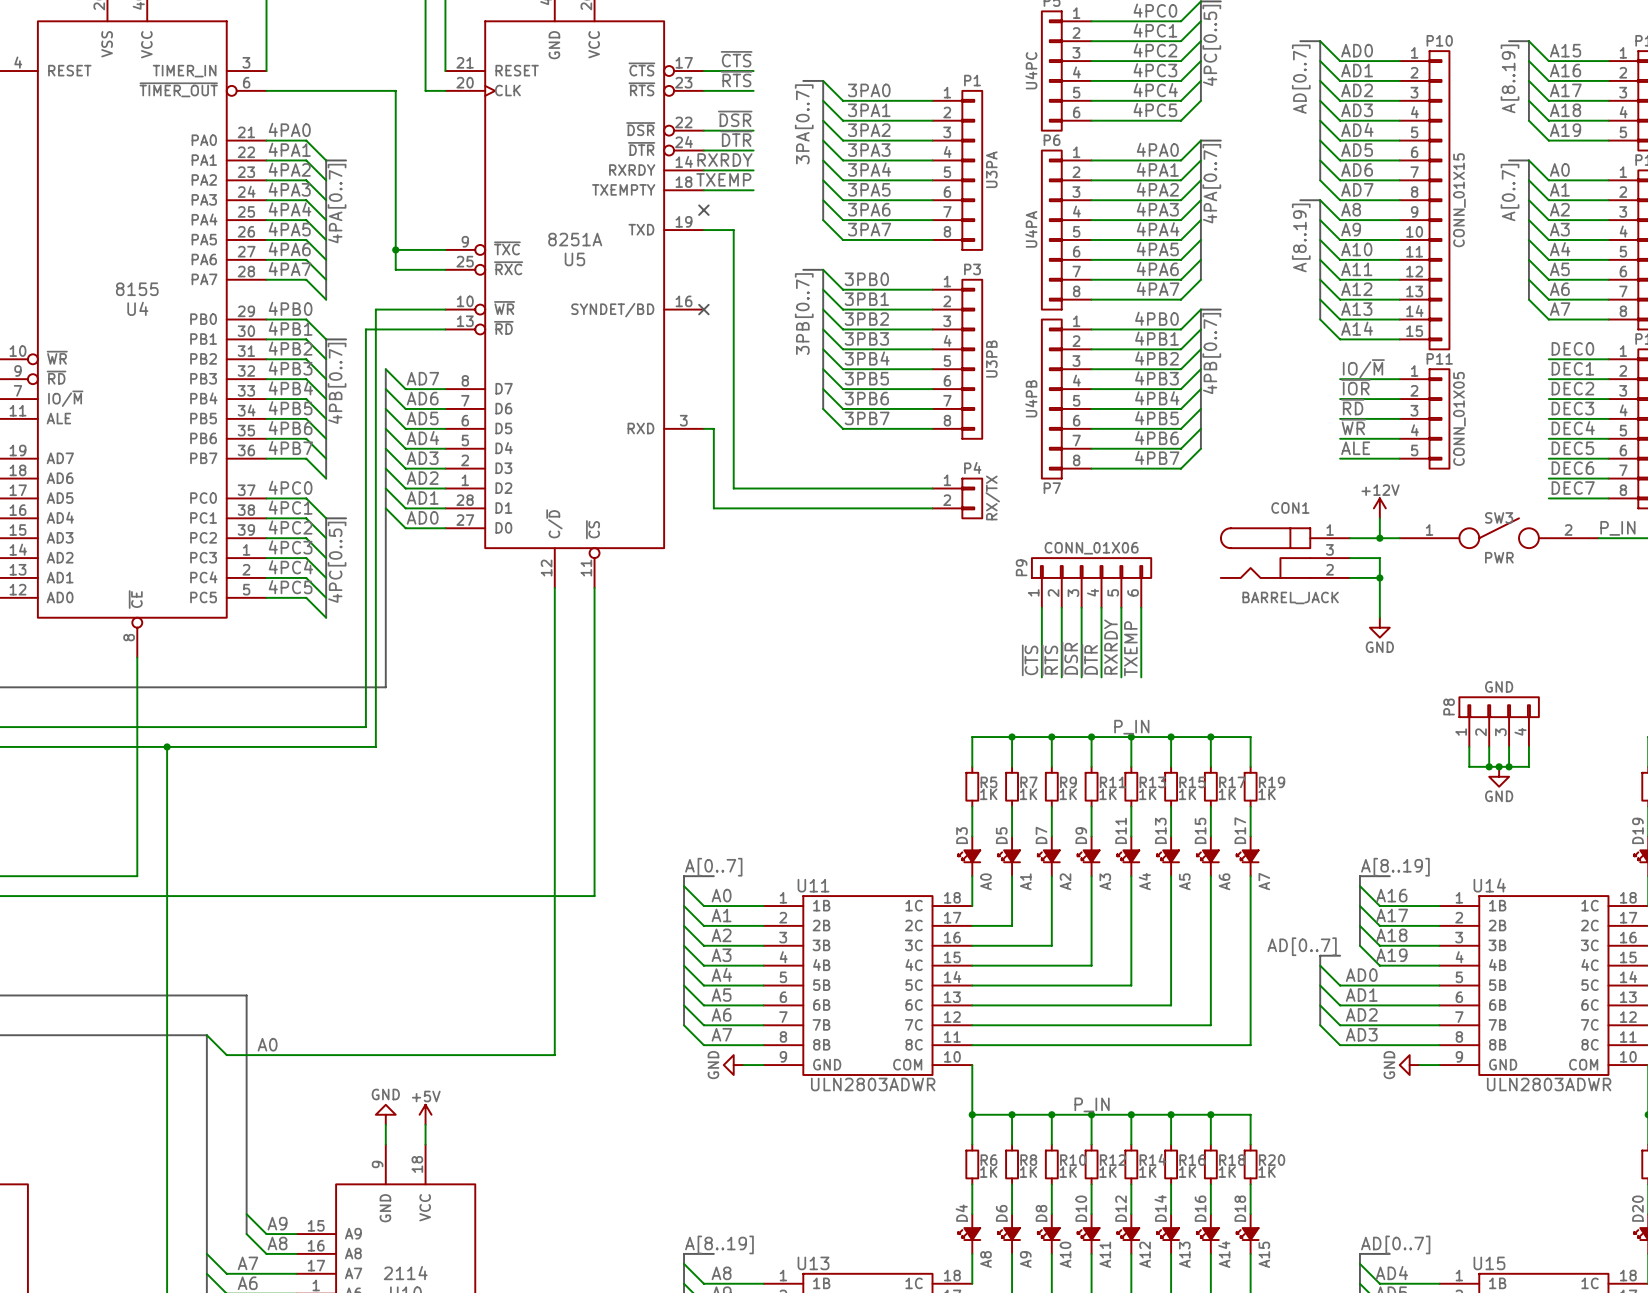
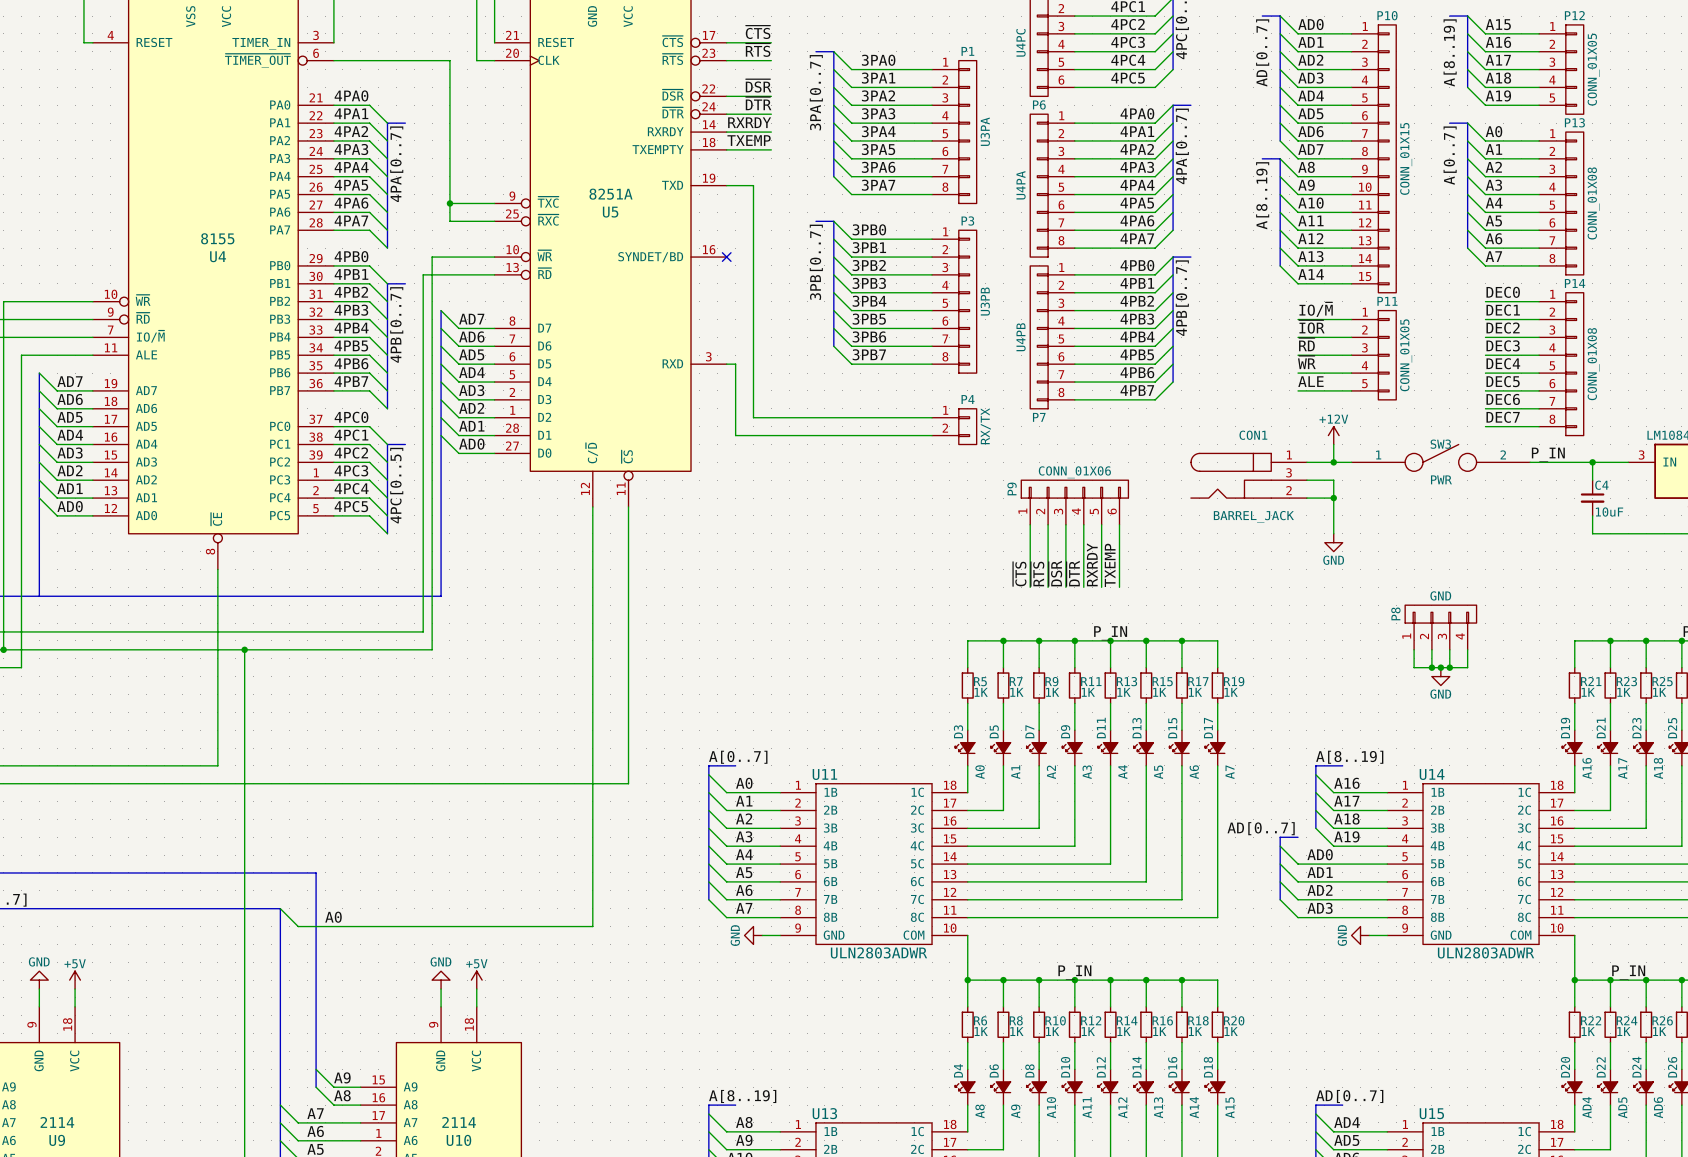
no-connect mark: (703, 210) -> none

